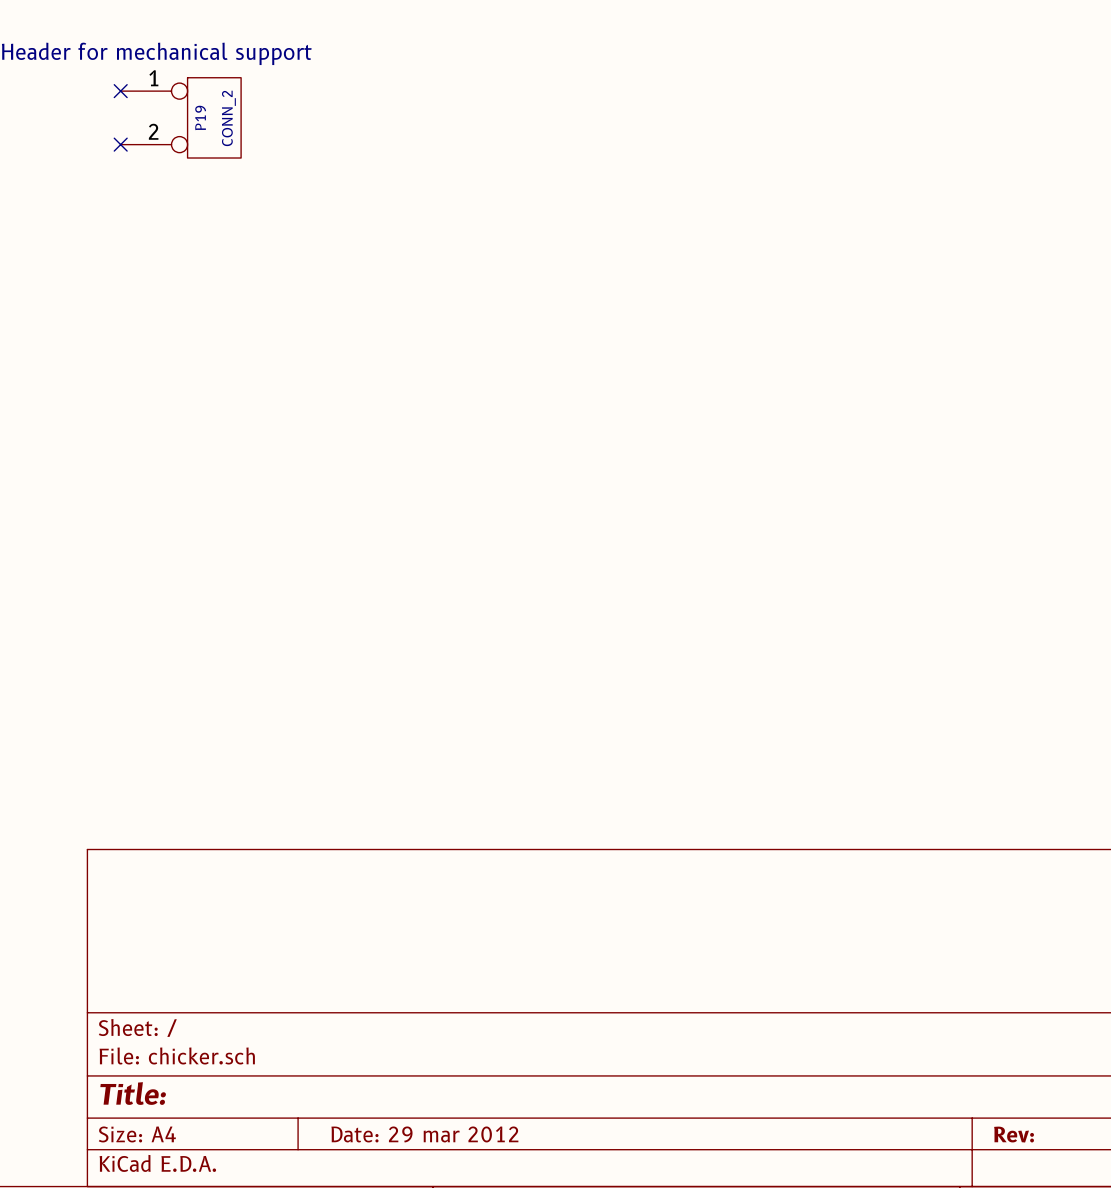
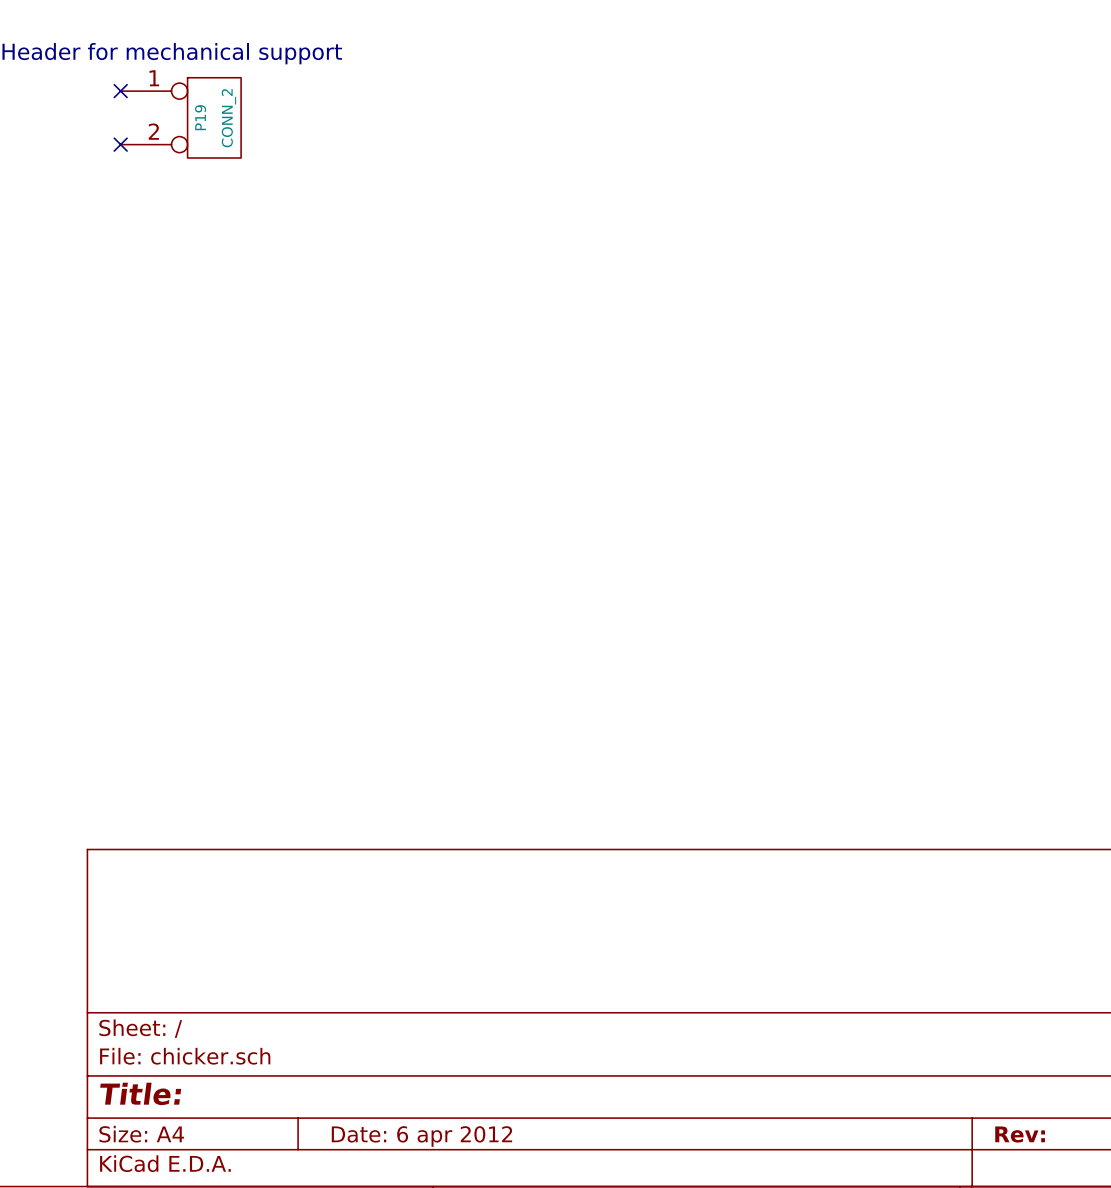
title block: Date: 29 mar 2012 (424, 1134) -> Date: 6 apr 2012 (421, 1136)

